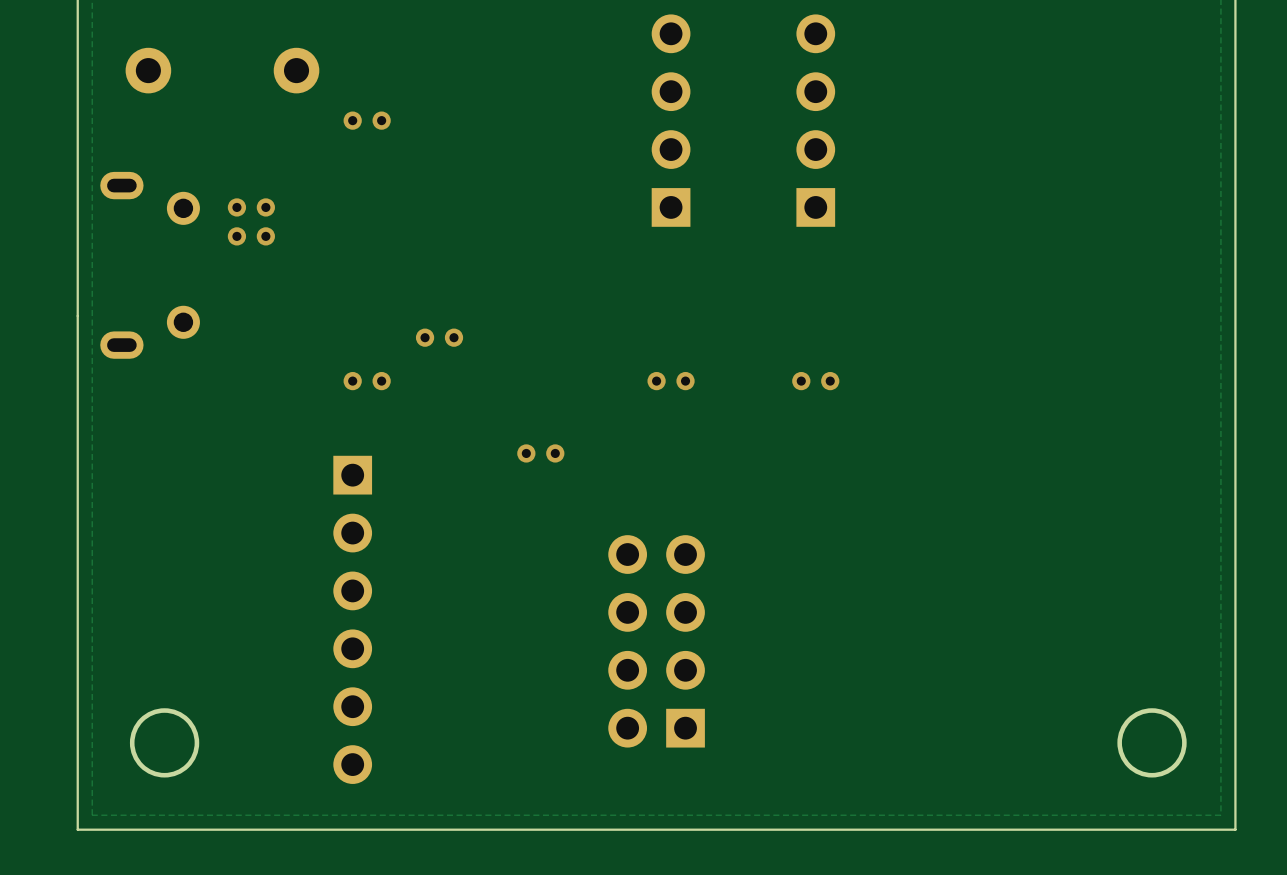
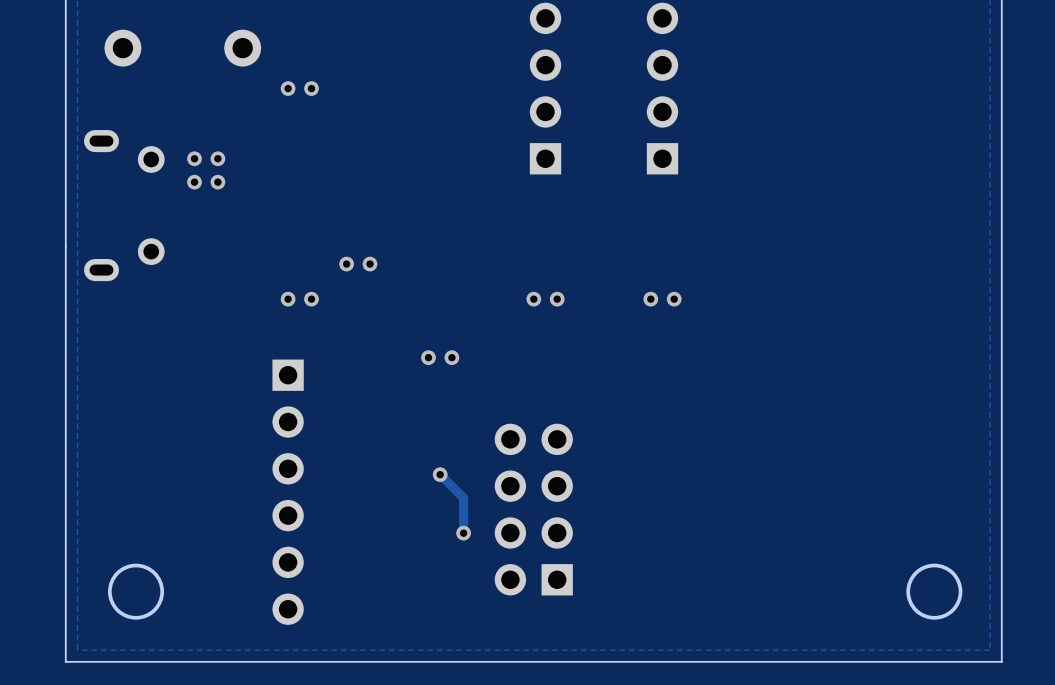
track: none -> (440, 474) (463, 498) (463, 533)
via: none -> (440, 474)
via: none -> (463, 533)

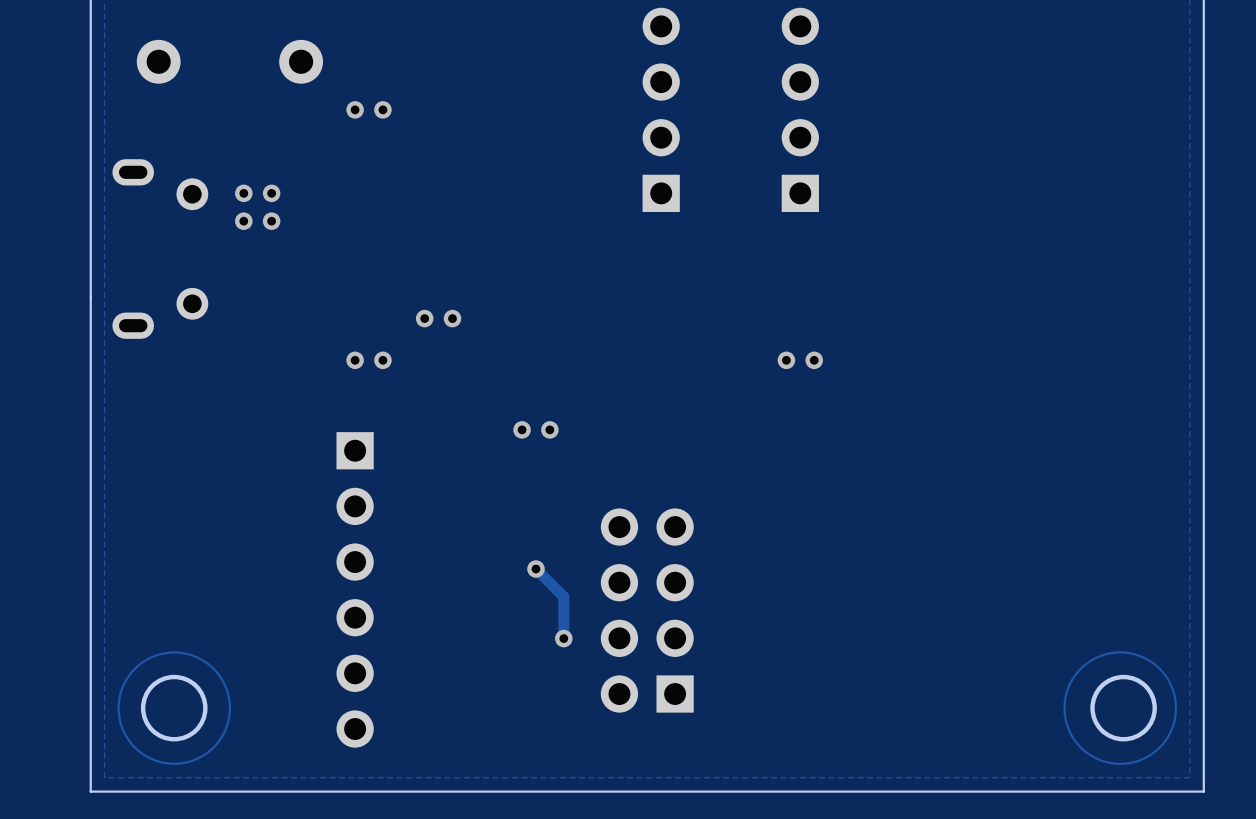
via: (533, 299) -> none
via: (557, 299) -> none
drawing: none -> [117, 651, 231, 765]
drawing: none -> [1063, 651, 1178, 765]

